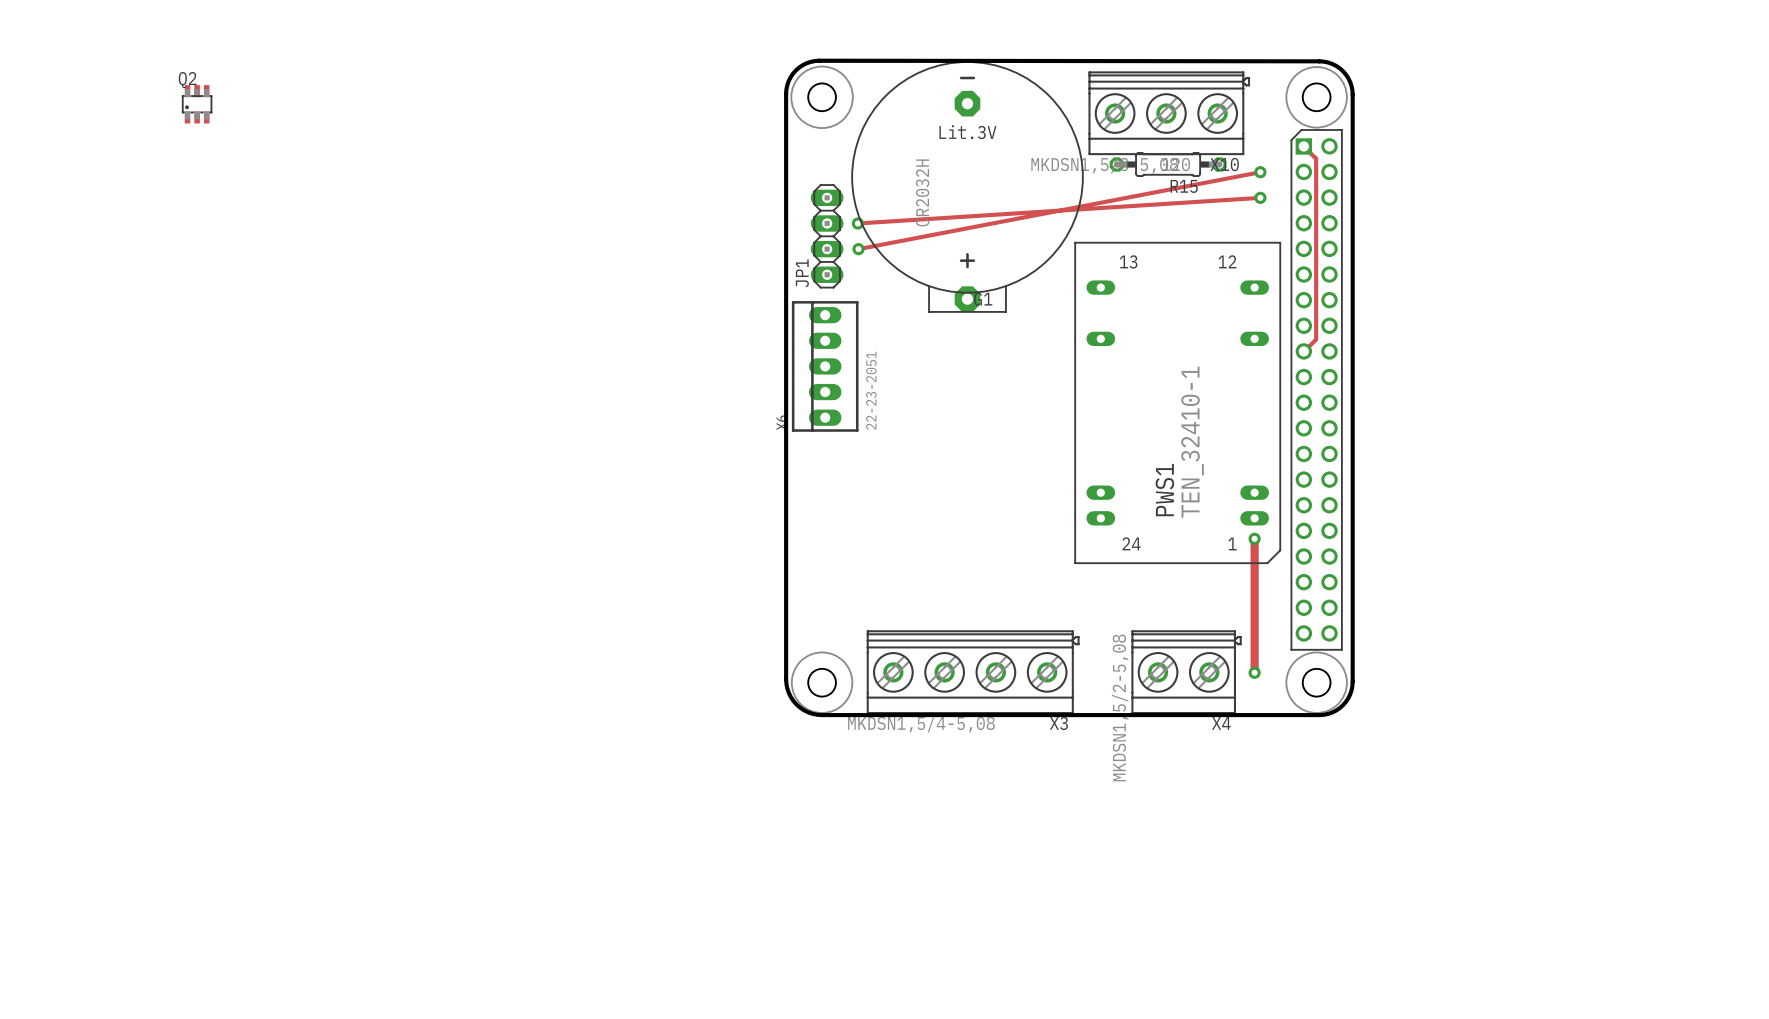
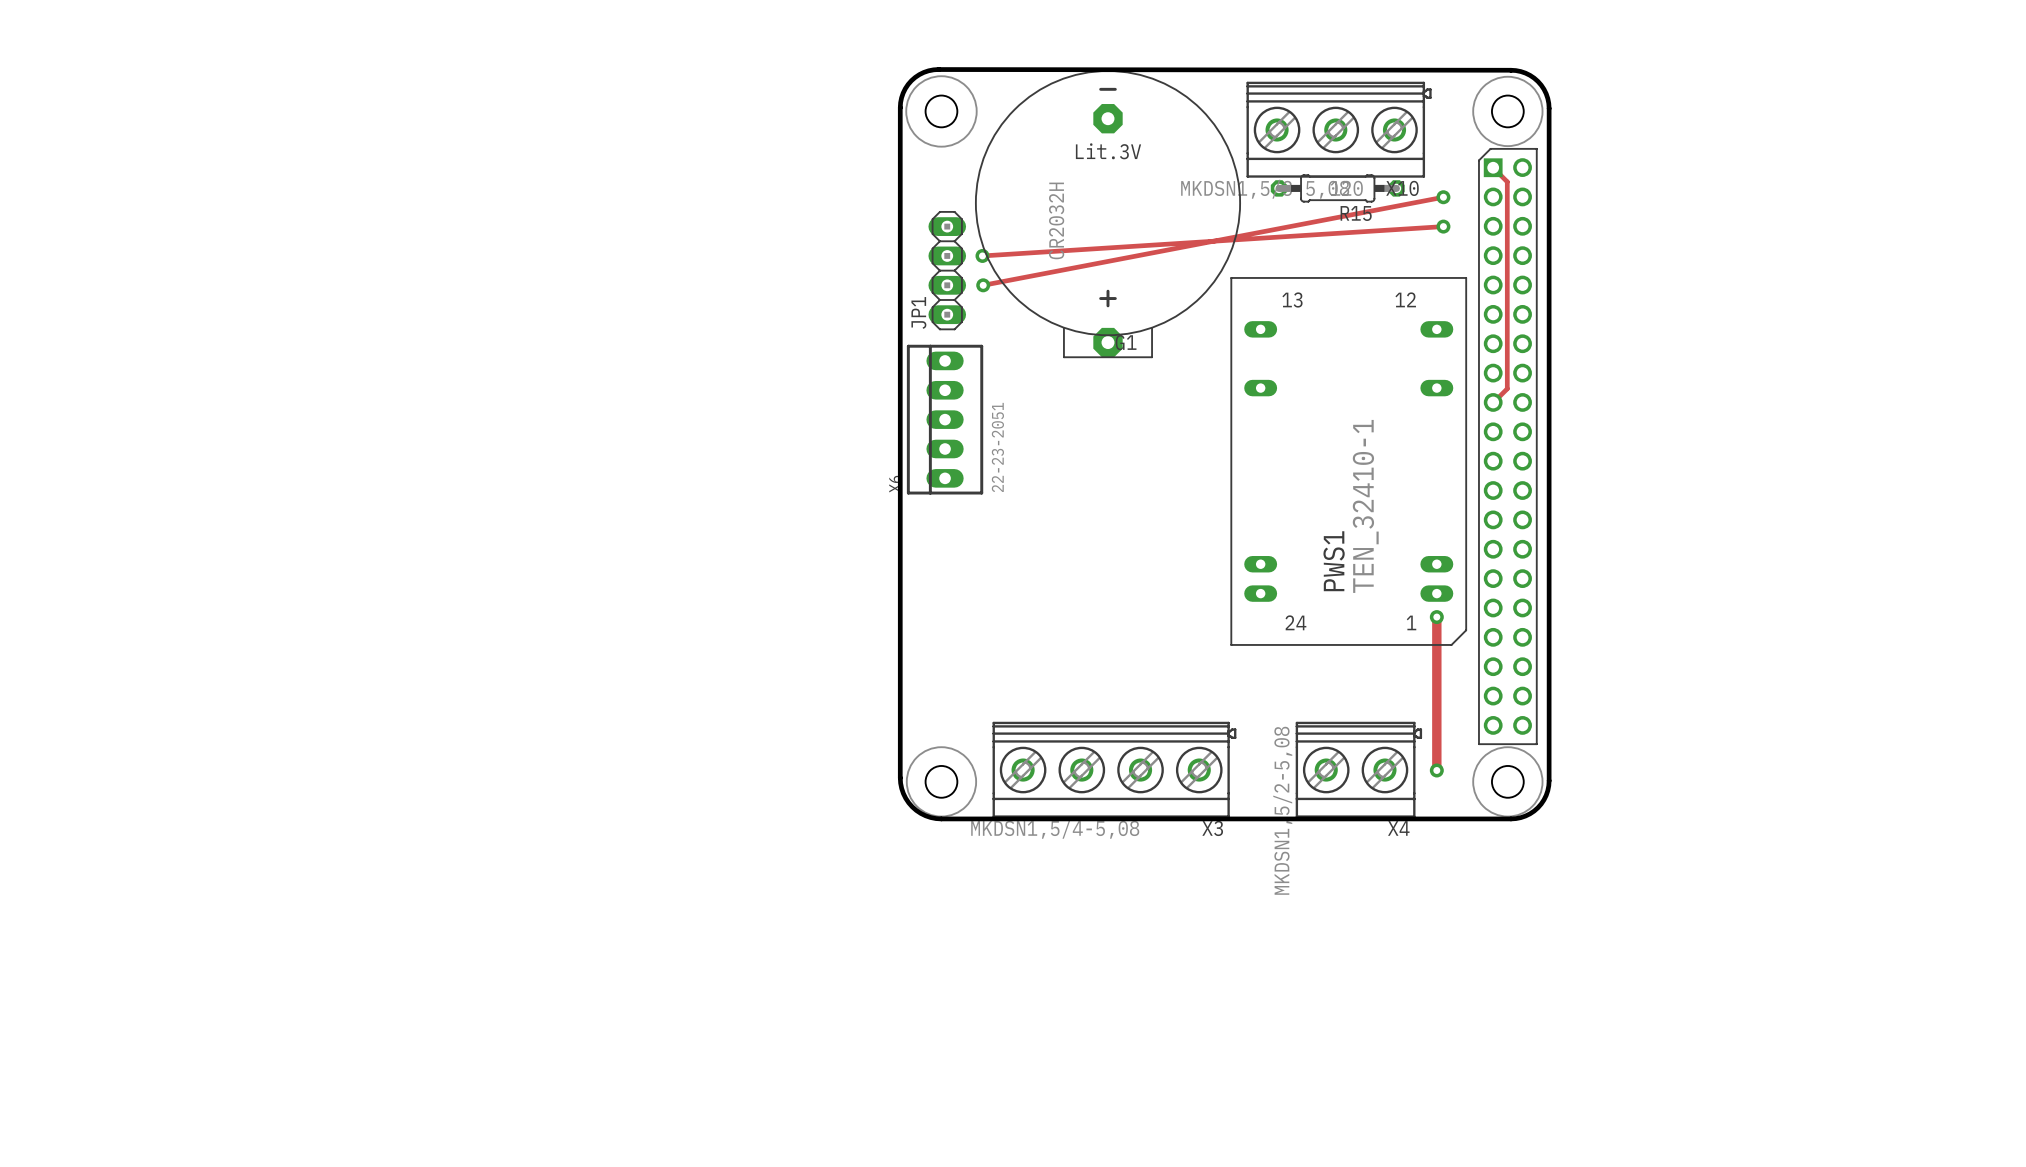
Q2: (197, 104) -> none

